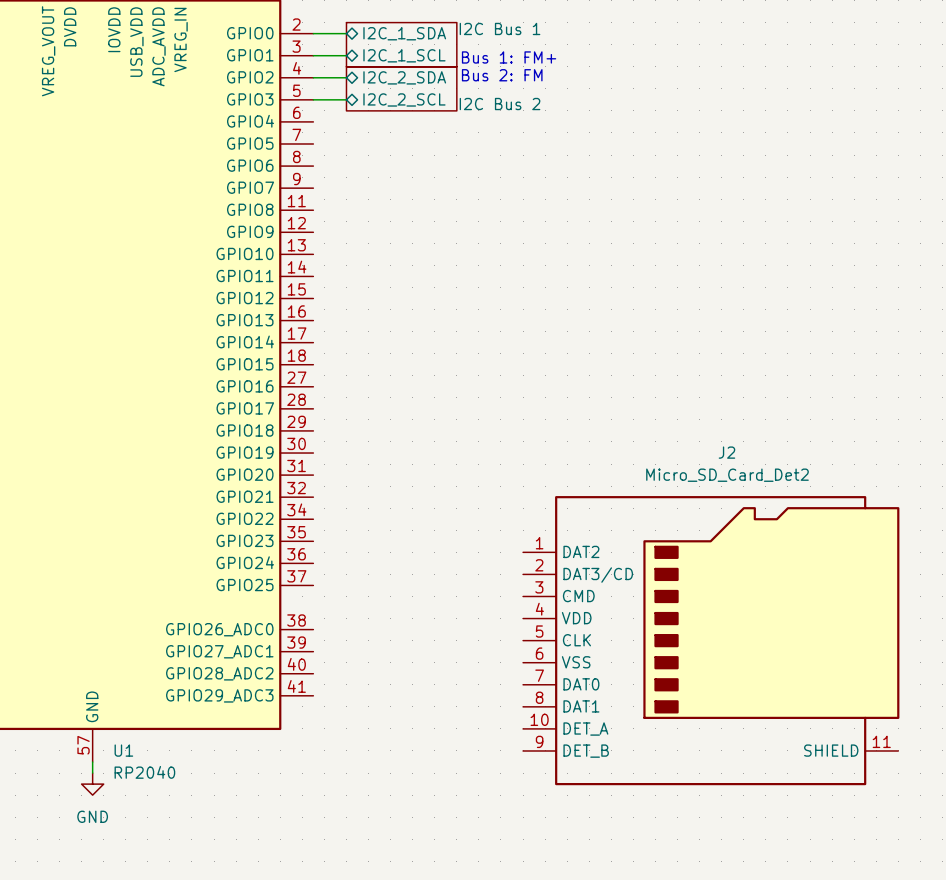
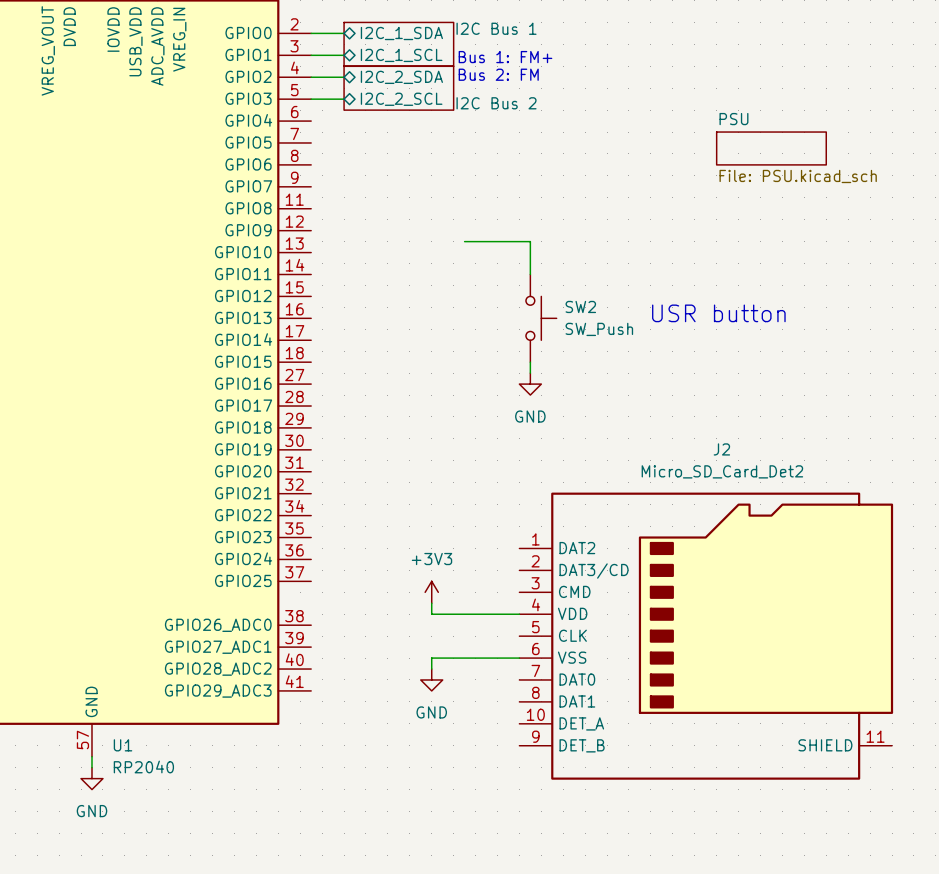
sheet PSU: none -> File: PSU.kicad_sch (771, 148)
wire: none -> (464, 241) (530, 241) (530, 274)
text: none -> USR button (718, 313)
SW2: none -> SW_Push (541, 318)
wire: none -> (530, 362) (530, 373)
power symbol: none -> GND (530, 384)
power symbol: none -> +3V3 (431, 592)
wire: none -> (431, 603) (431, 614) (519, 614)
wire: none -> (519, 658) (431, 658) (431, 669)
power symbol: none -> GND (431, 679)

